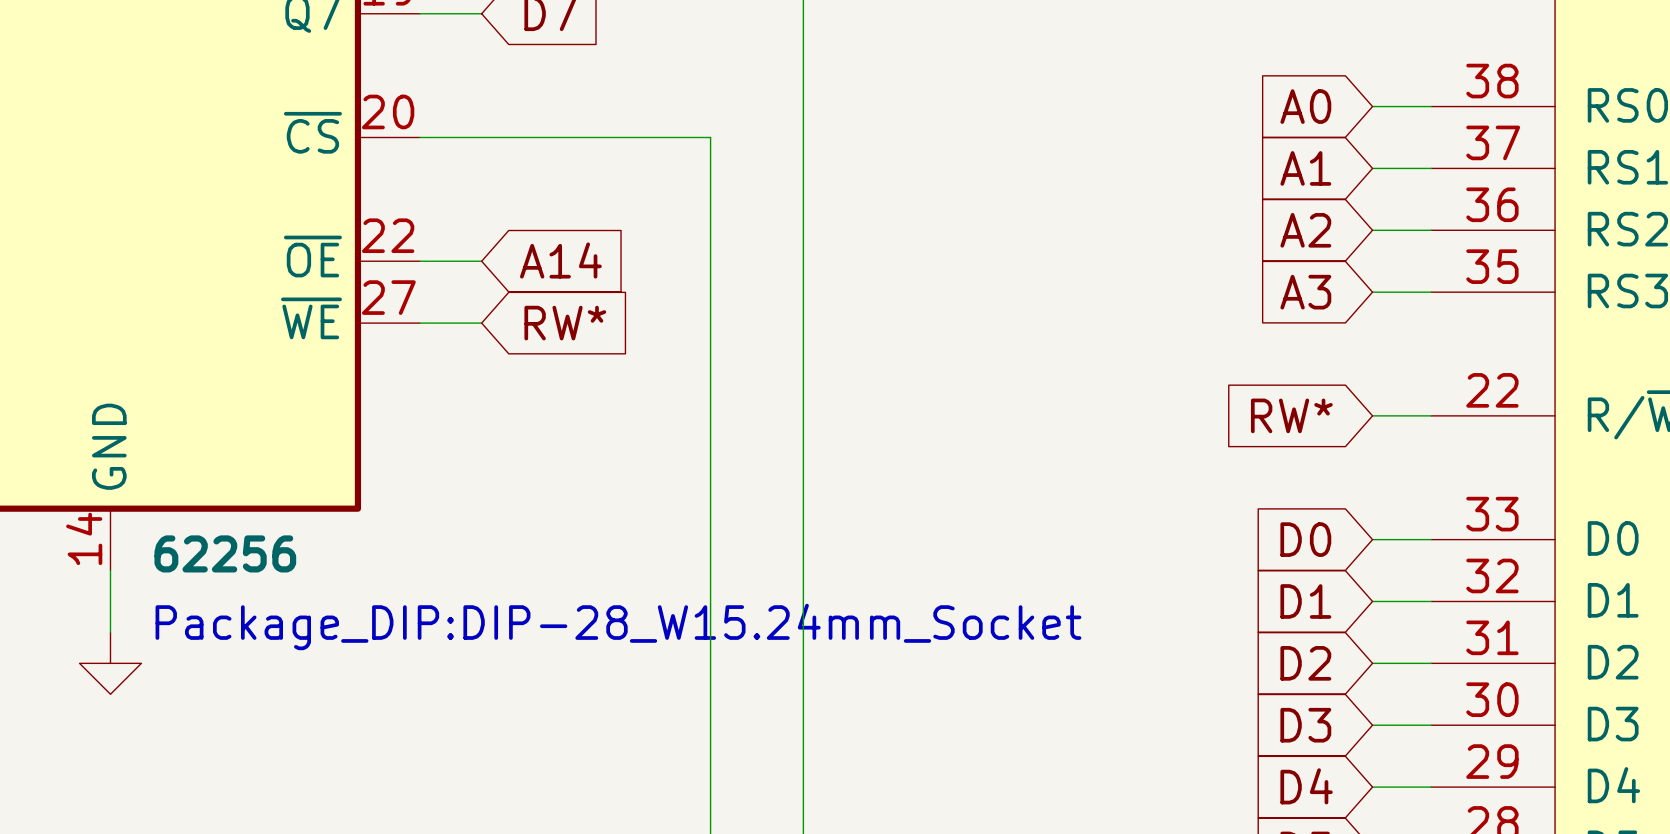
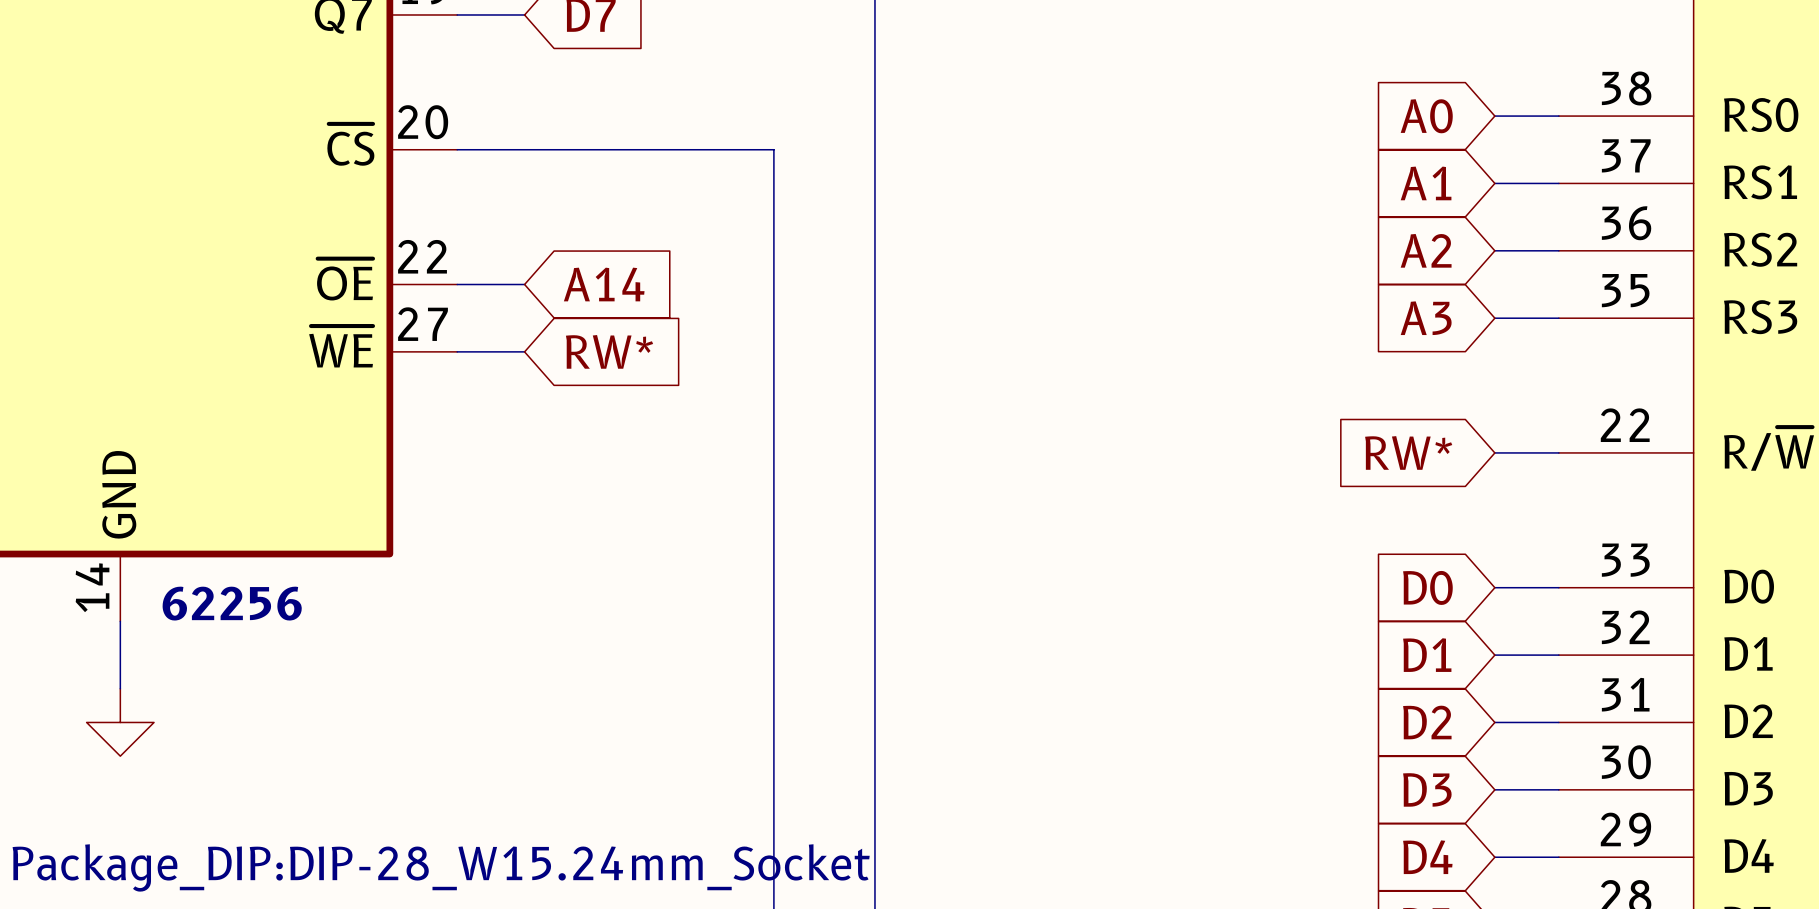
text position: Package_DIP:DIP-28_W15.24mm_Socket (618, 626) -> Package_DIP:DIP-28_W15.24mm_Socket (441, 867)

